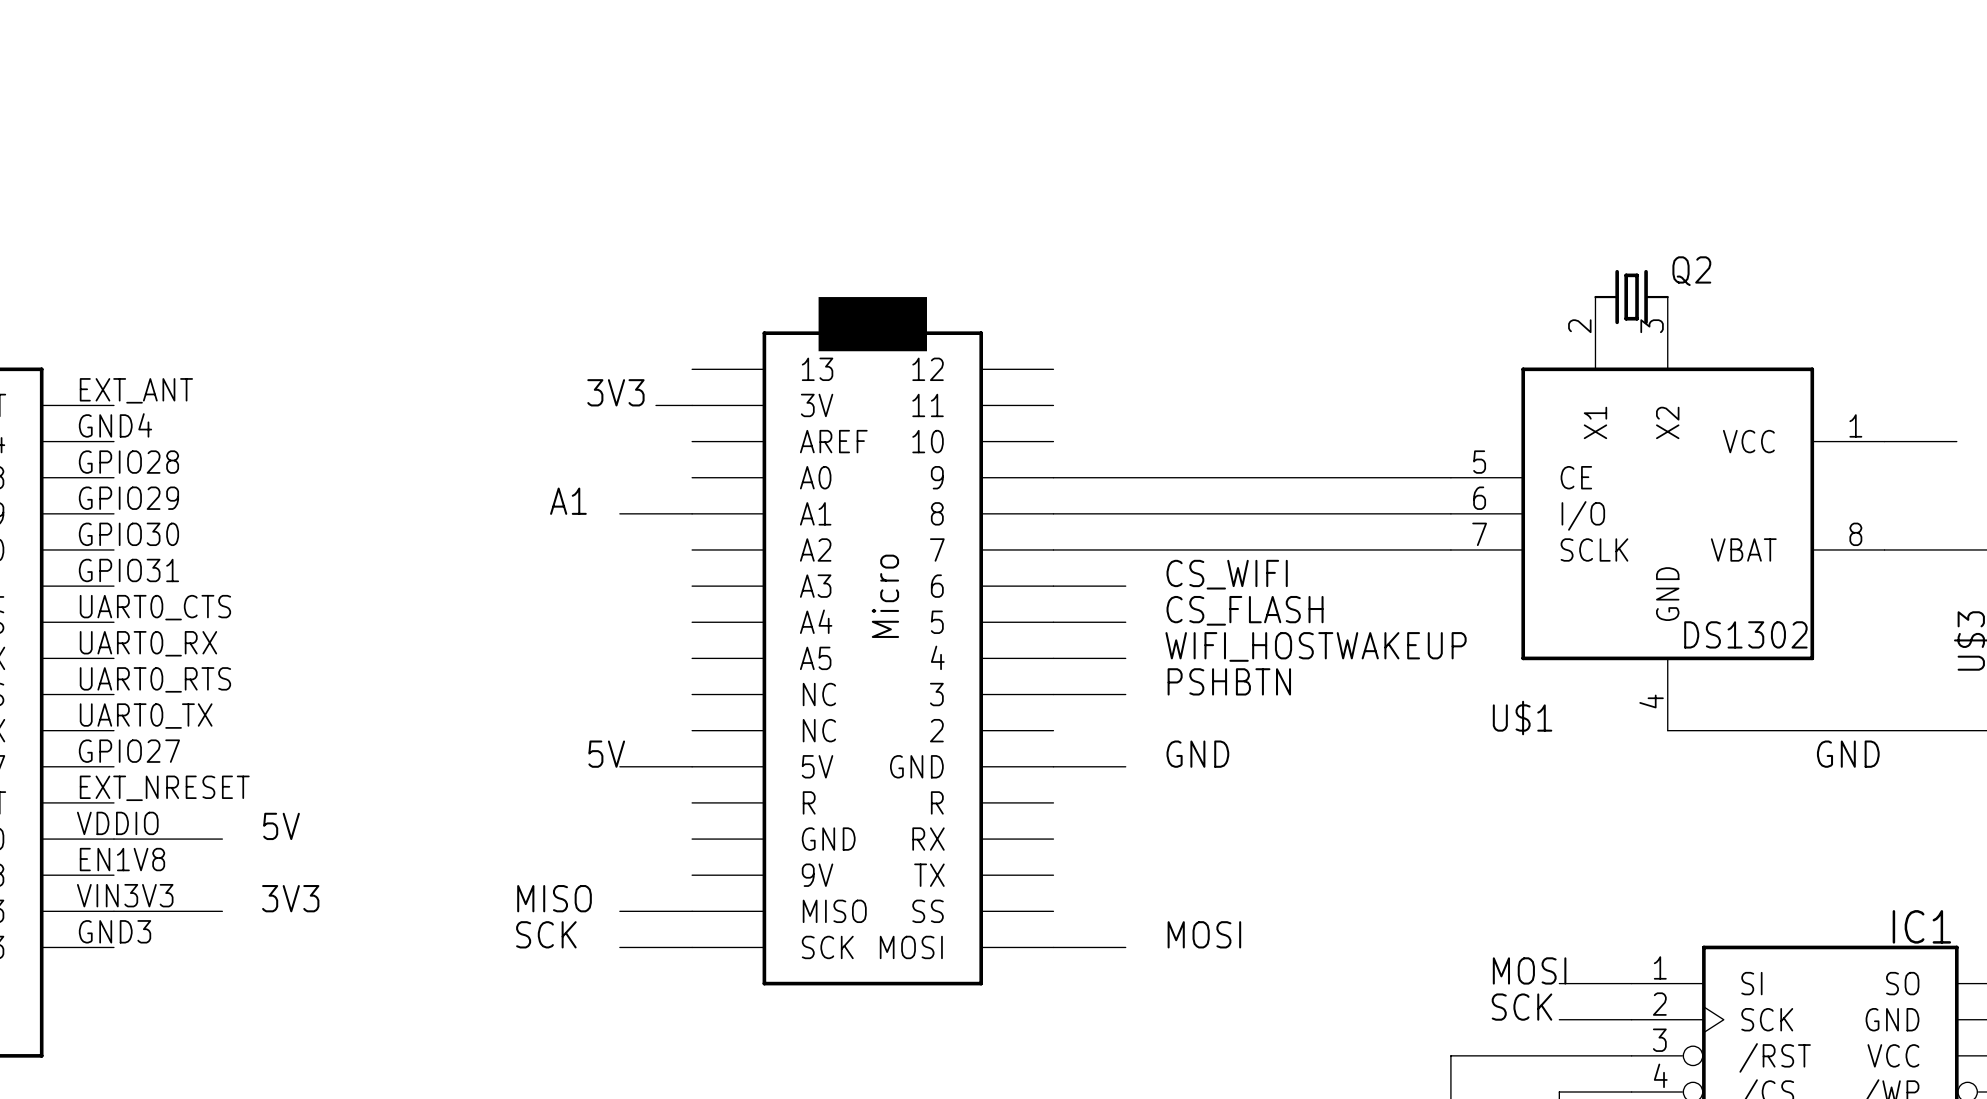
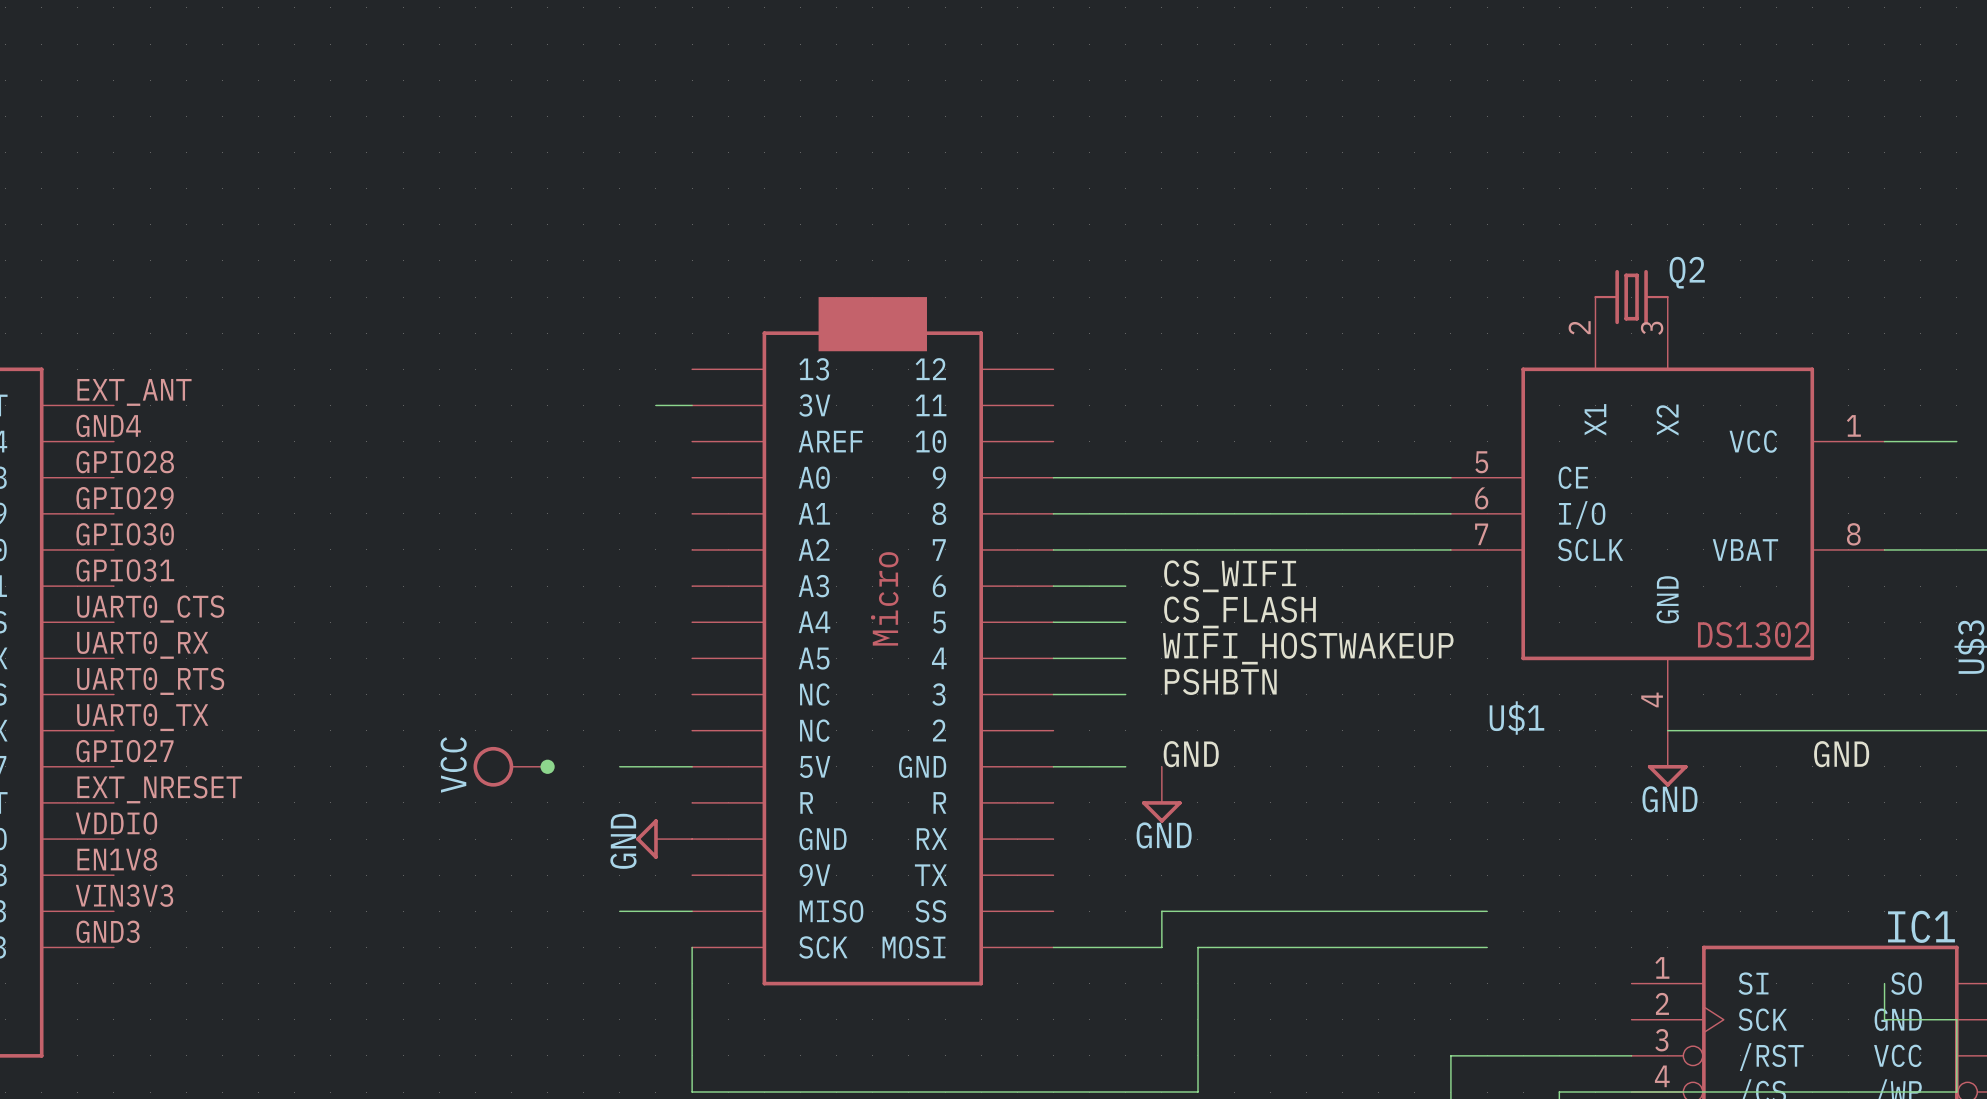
label: 3V3 (615, 392) -> none
label: A1 (568, 501) -> none
wire: (619, 513) (692, 513) -> none
label: 5V (606, 754) -> none
power symbol: none -> GND (1667, 758)
power symbol: none -> VCC (510, 766)
junction: none -> (547, 766)
power symbol: none -> GND (1161, 794)
label: 5V (281, 826) -> none
wire: (113, 839) (222, 839) -> none
power symbol: none -> GND (664, 839)
label: 3V3 (290, 898) -> none
label: MISO (554, 898) -> none
wire: (113, 911) (222, 911) -> none
wire: none -> (1487, 911) (1161, 911) (1161, 947) (1125, 947)
label: SCK (546, 934) -> none
label: MOSI (1204, 934) -> none
wire: (619, 947) (692, 947) -> (1487, 947) (1197, 947) (1197, 1092) (692, 1092) (692, 947)
label: MOSI (1529, 970) -> none
wire: (1559, 983) (1631, 983) -> none
wire: none -> (1884, 983) (1884, 1019) (1956, 1019) (1956, 1092) (1631, 1092)
label: SCK (1522, 1007) -> none
wire: (1559, 1019) (1631, 1019) -> none

